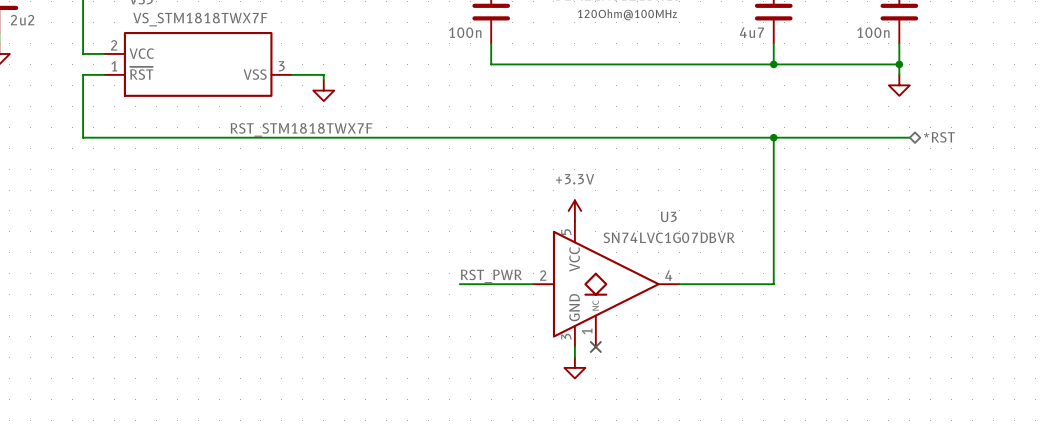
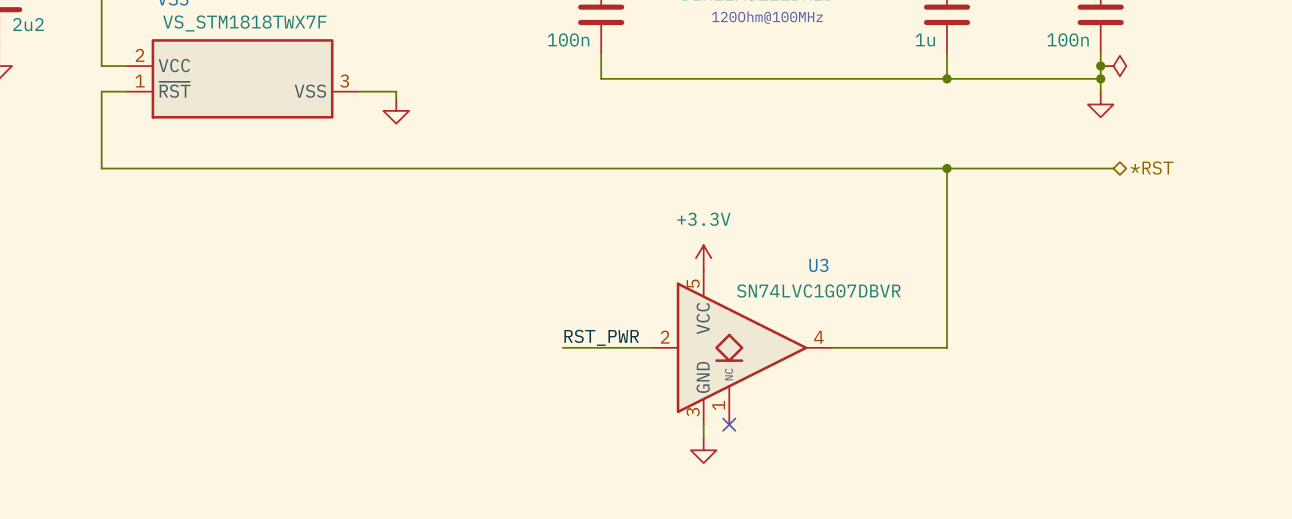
part value: 4u7 (751, 32) -> 1u (925, 40)
junction: none -> (1100, 66)
power symbol: none -> (1113, 66)
label: RST_STM1818TWX7F (301, 129) -> none

